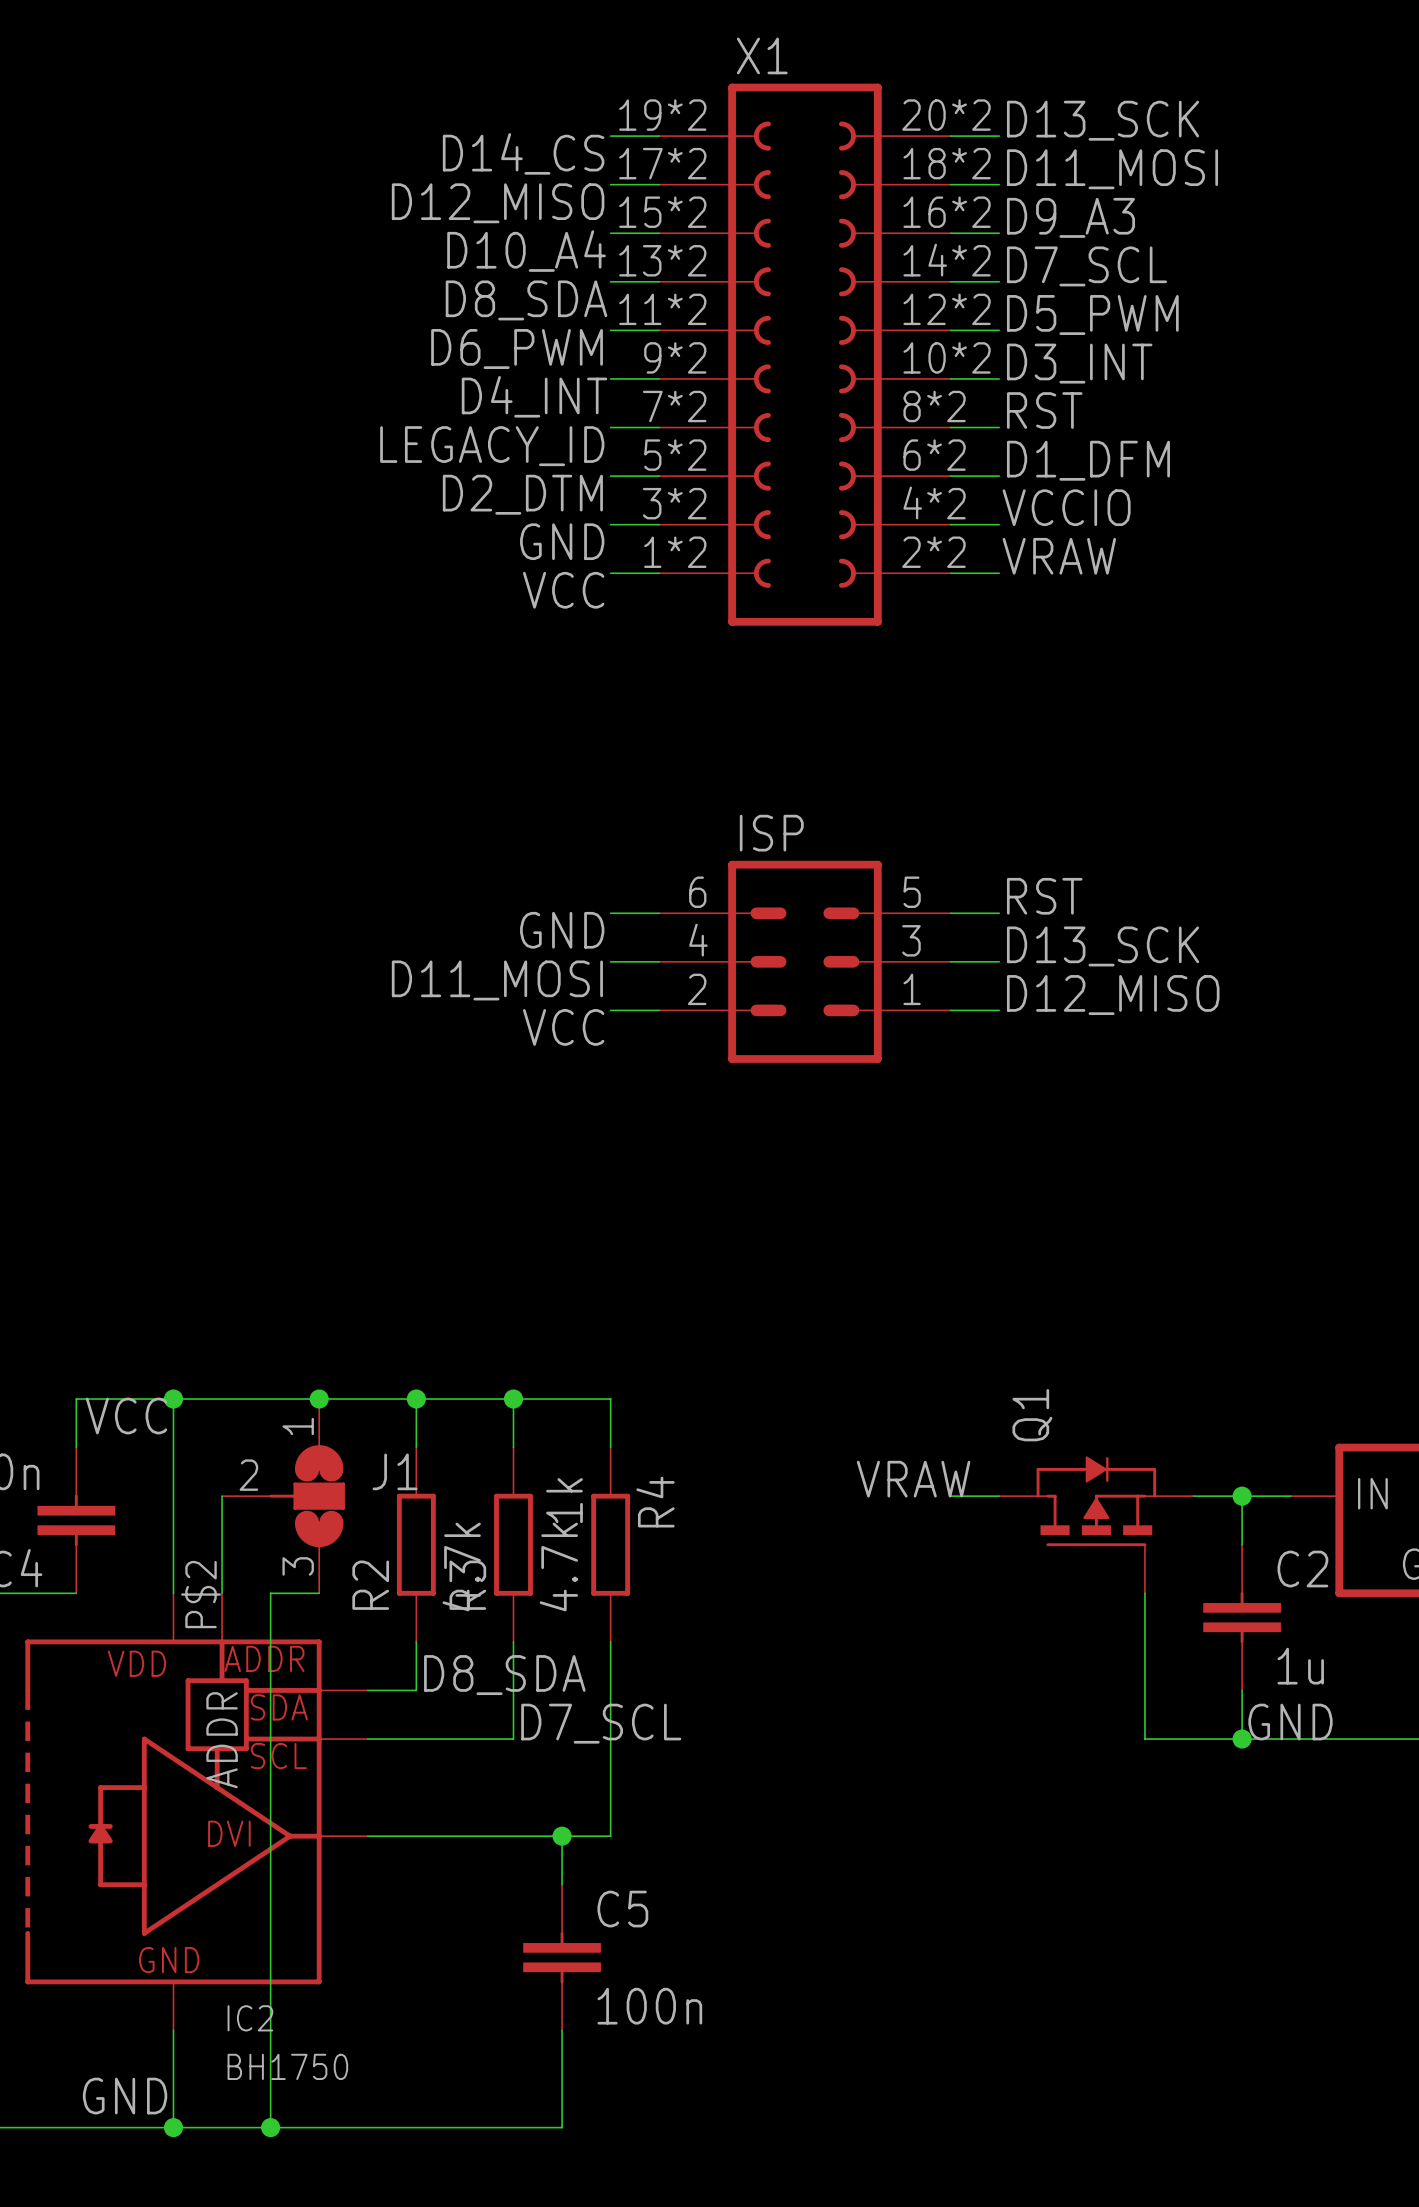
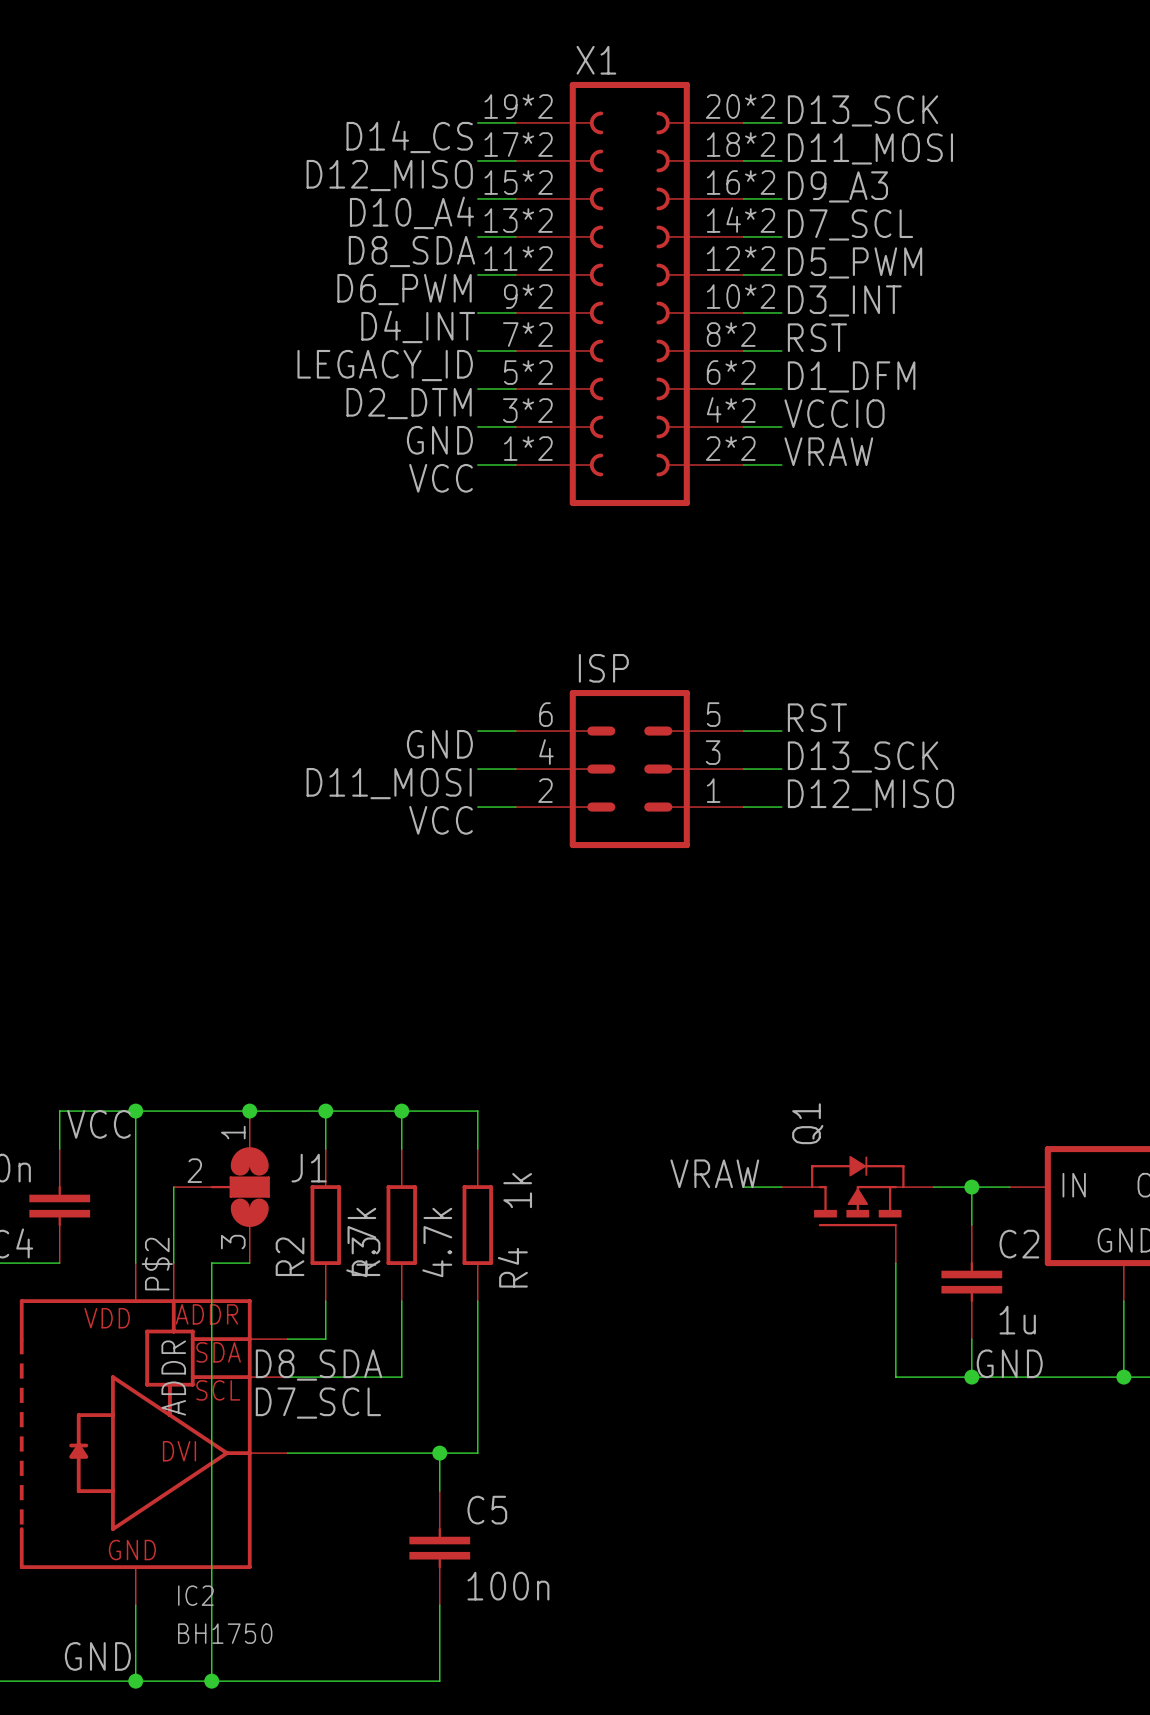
R4 value position: 1k (564, 1500) -> 1k (517, 1190)
R4 name position: R4 (655, 1502) -> R4 (512, 1267)
label position: D8_SDA (504, 1675) -> D8_SDA (318, 1365)
label position: D7_SCL (601, 1723) -> D7_SCL (318, 1403)

